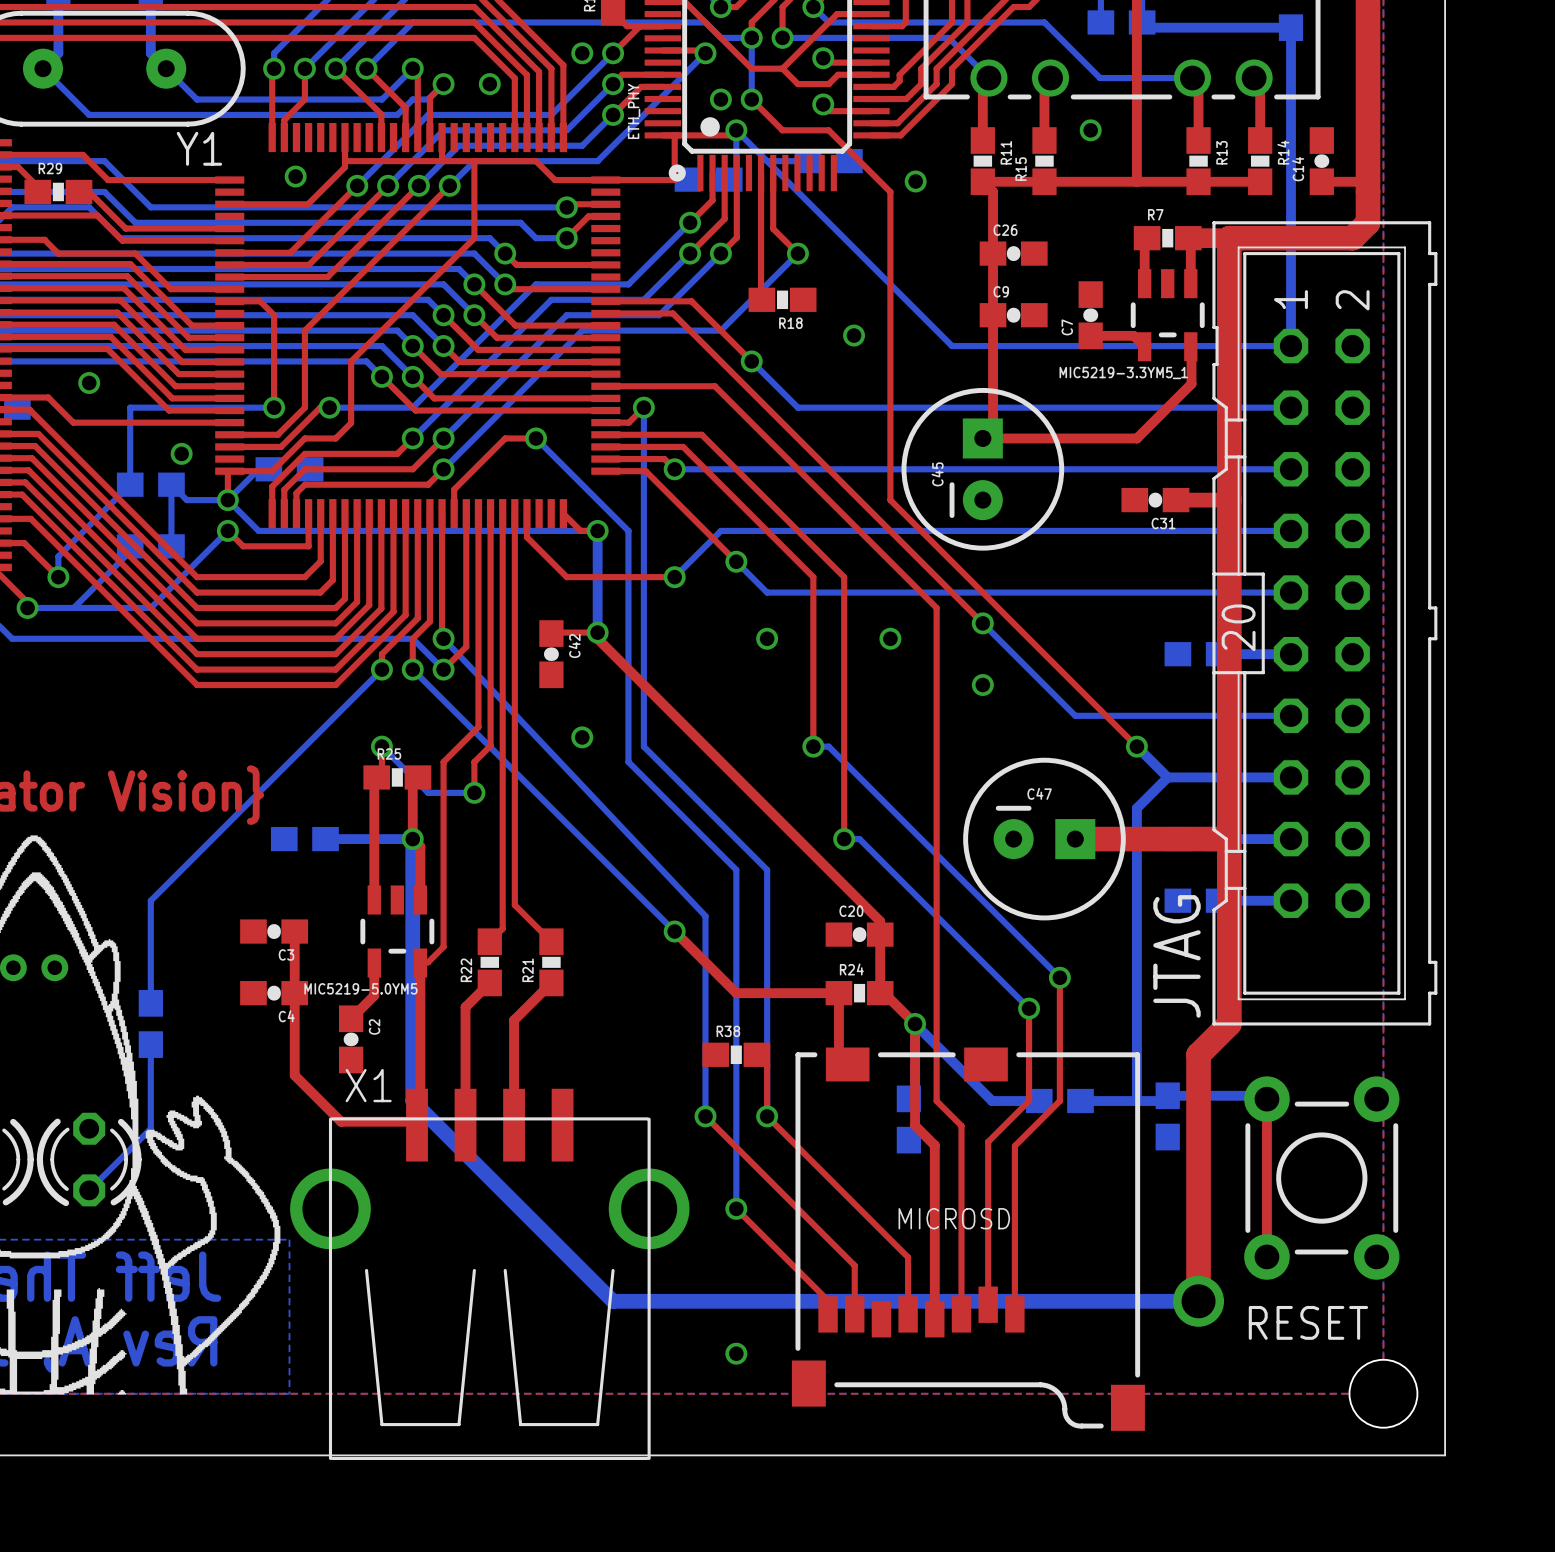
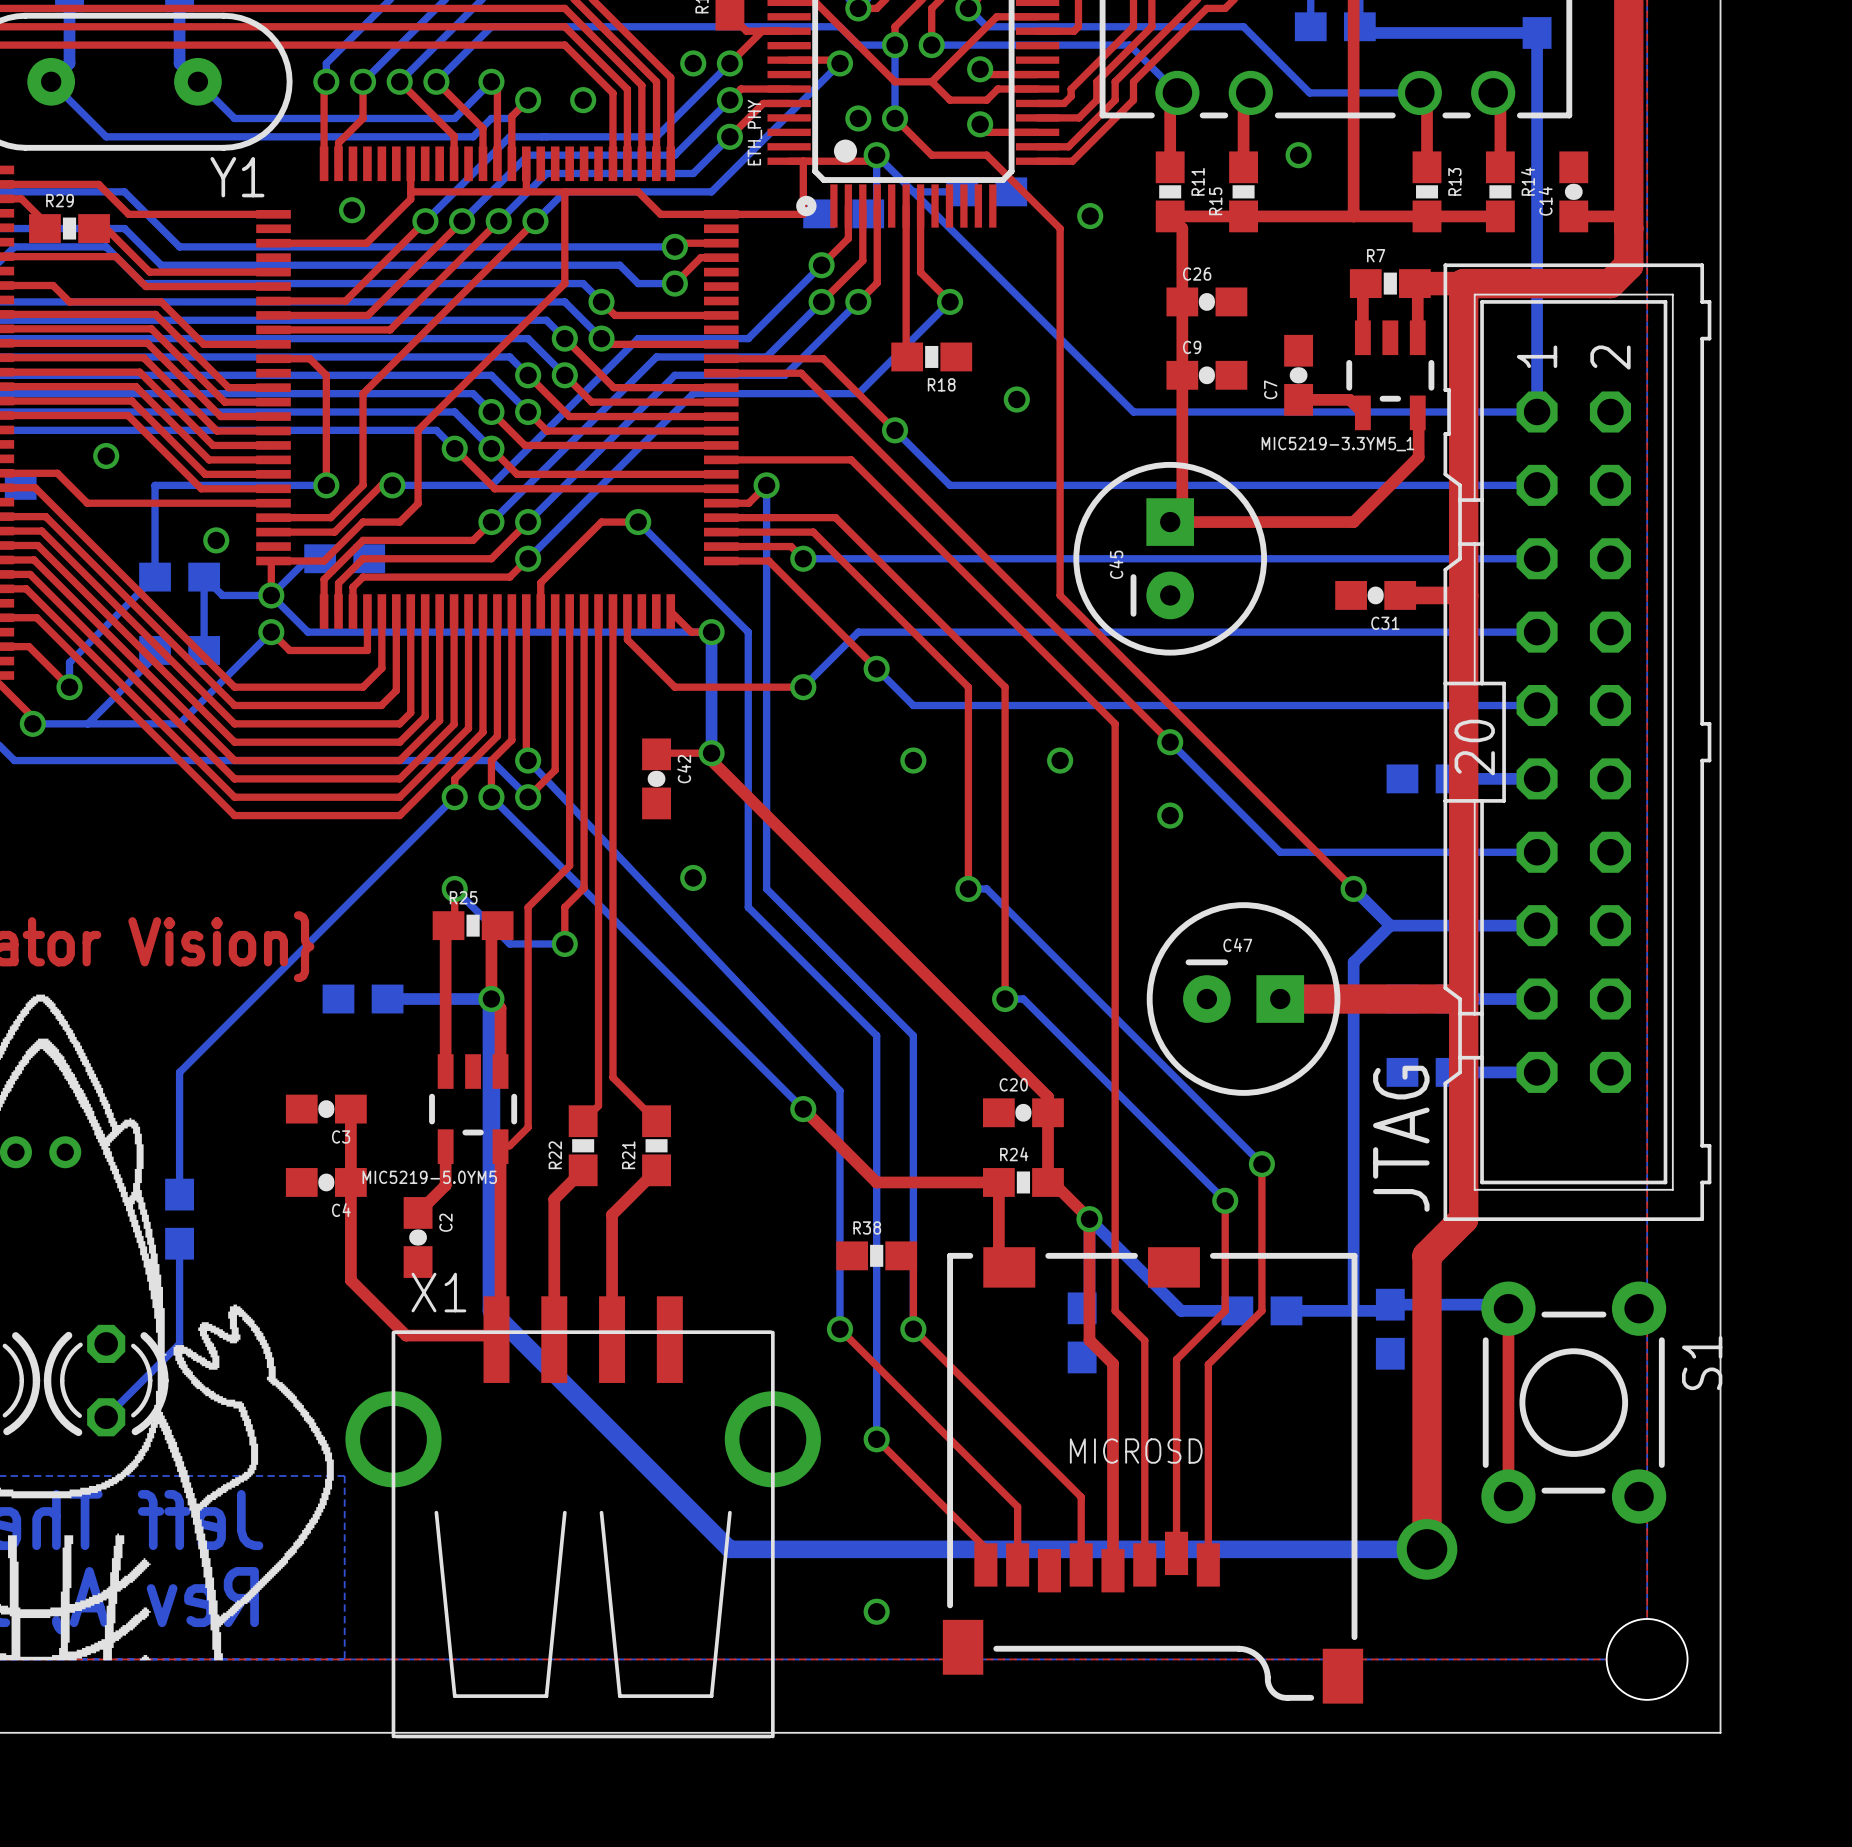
RESET name: RESET (1308, 1322) -> S1 (1702, 1363)

